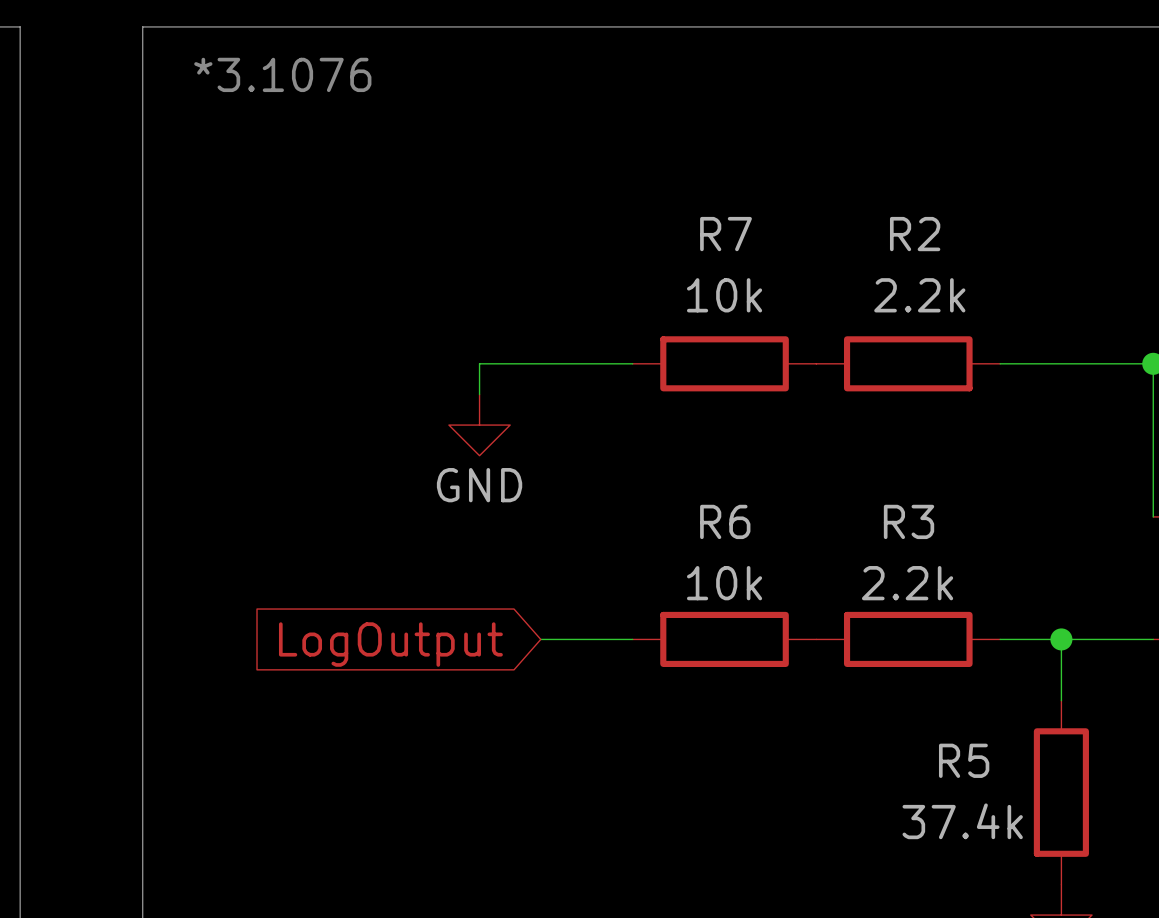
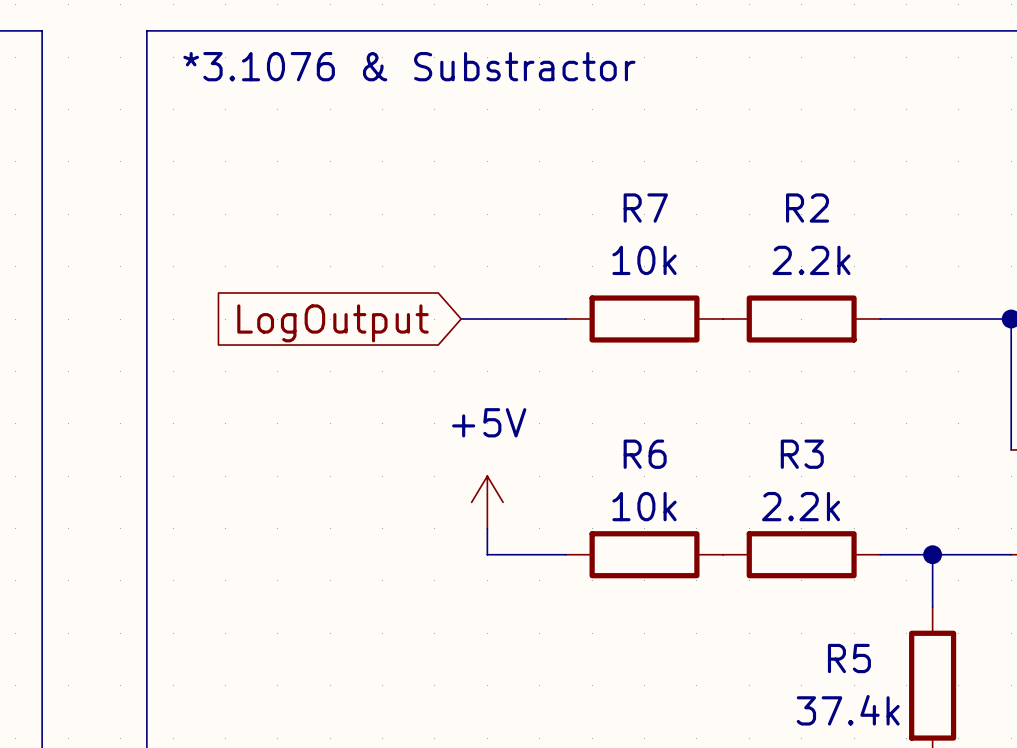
text: none -> *3.1076 & Substractor (409, 66)
text: *3.1076 (282, 74) -> none
wire: (510, 363) (479, 363) (479, 394) -> none
power symbol: GND (479, 425) -> none
power symbol: none -> +5V (487, 502)
wire: none -> (487, 528) (487, 554)
global label position: LogOutput (390, 644) -> LogOutput (332, 323)

